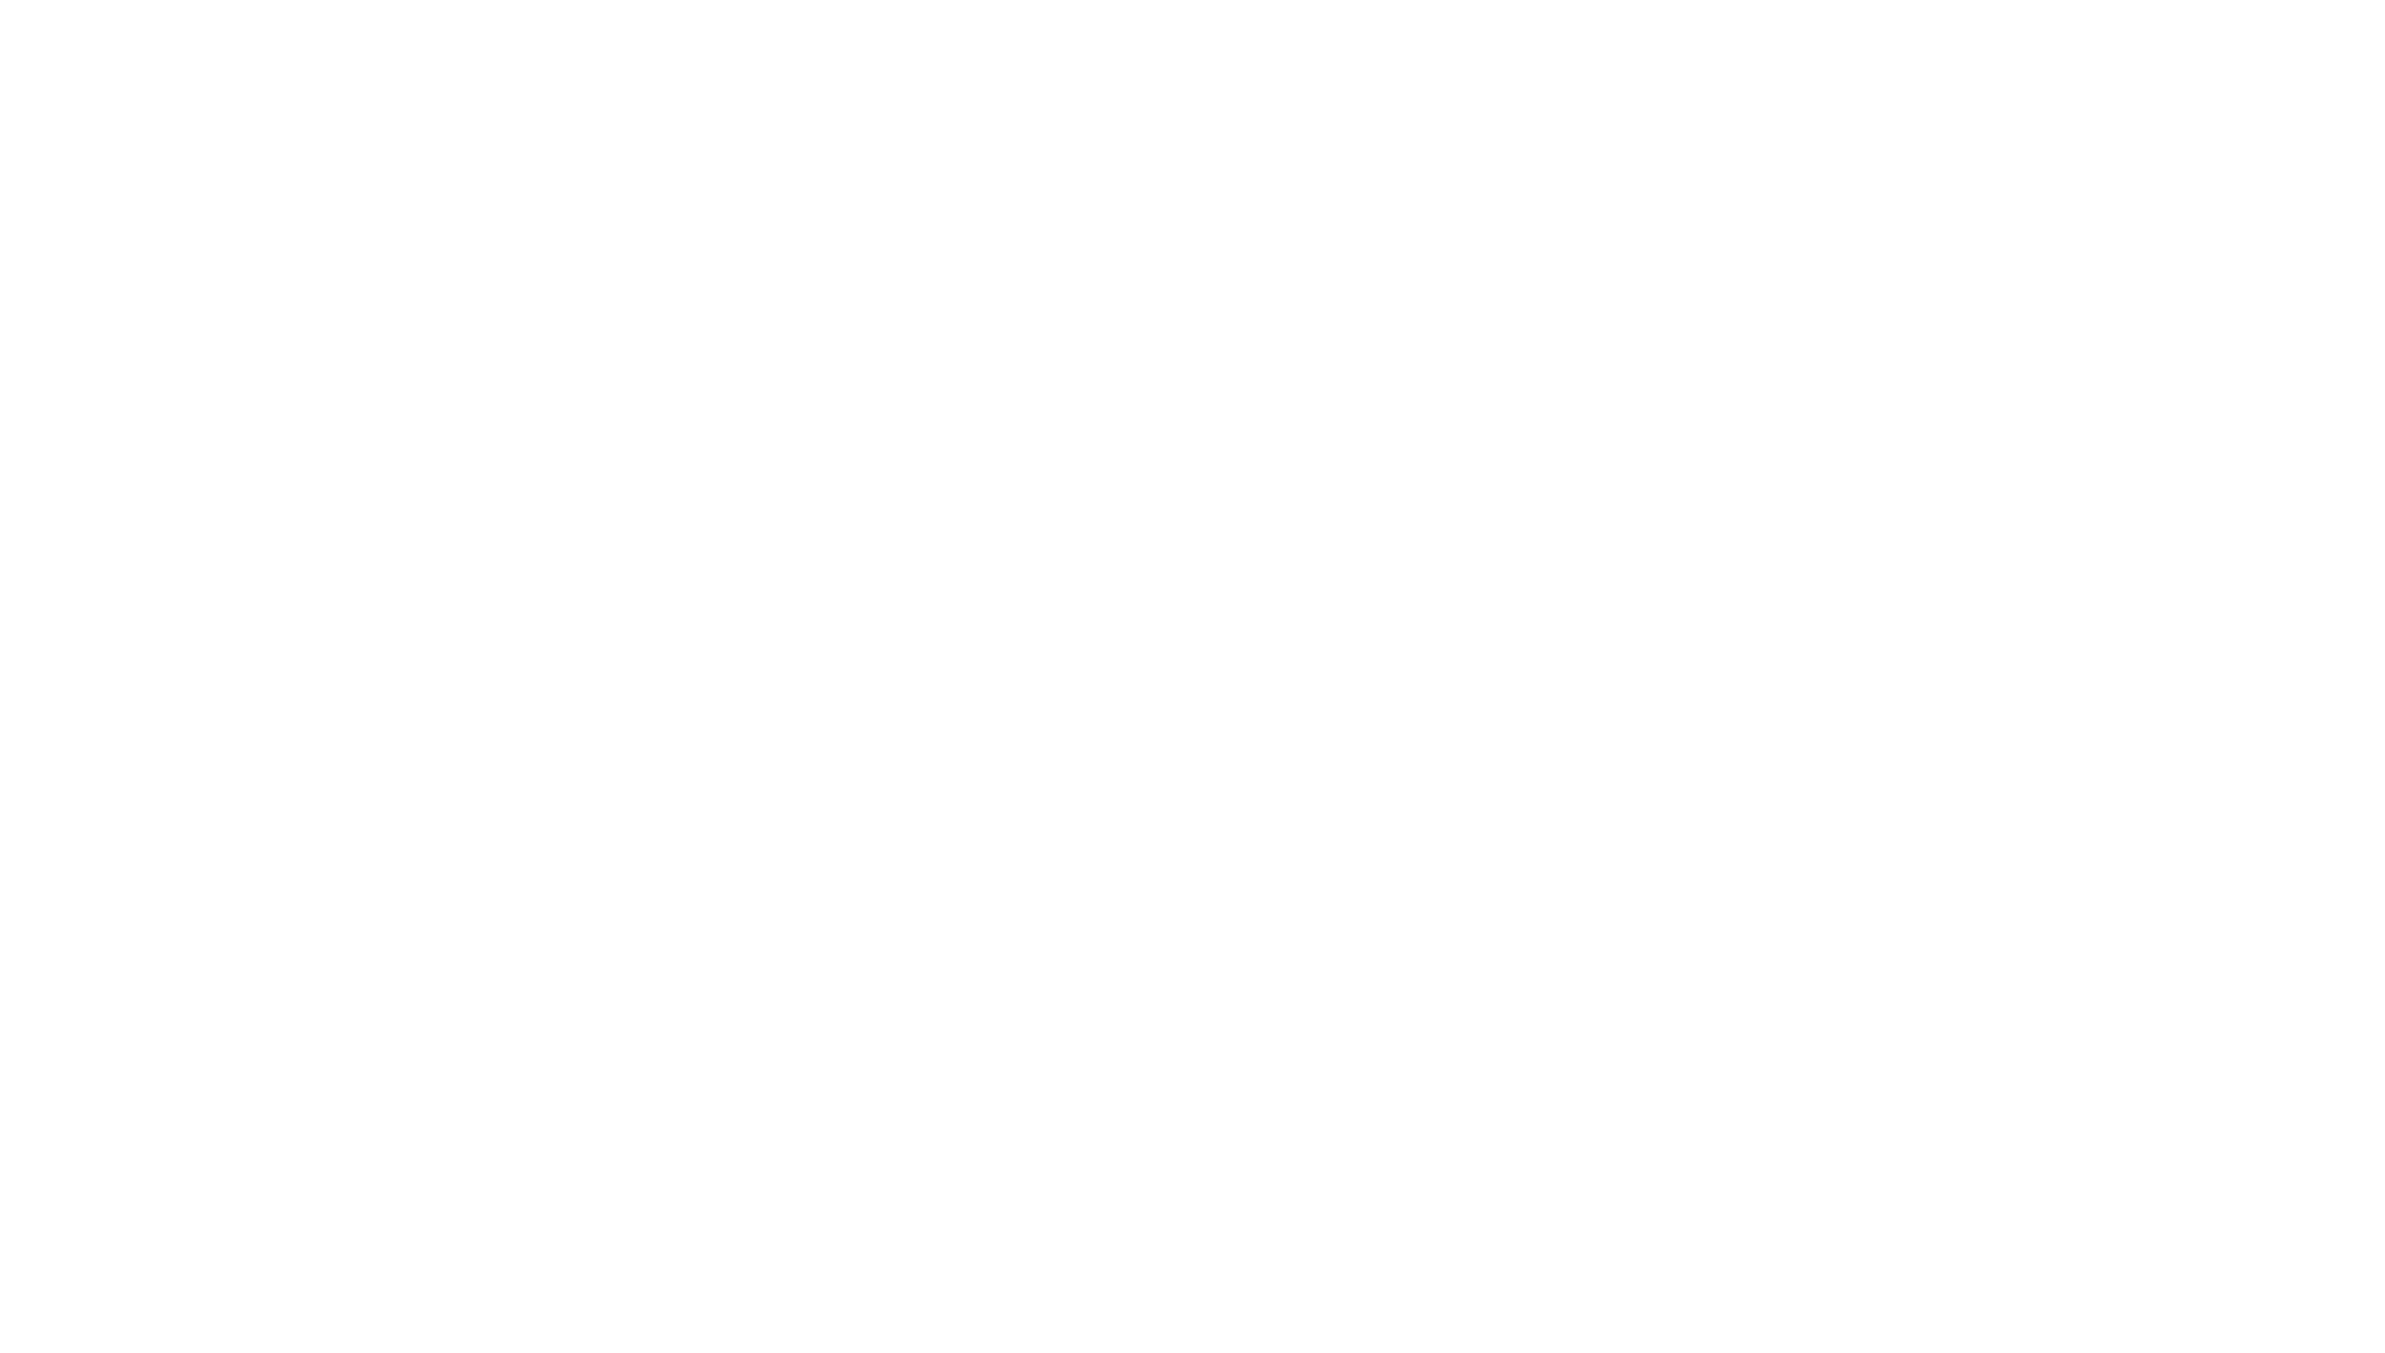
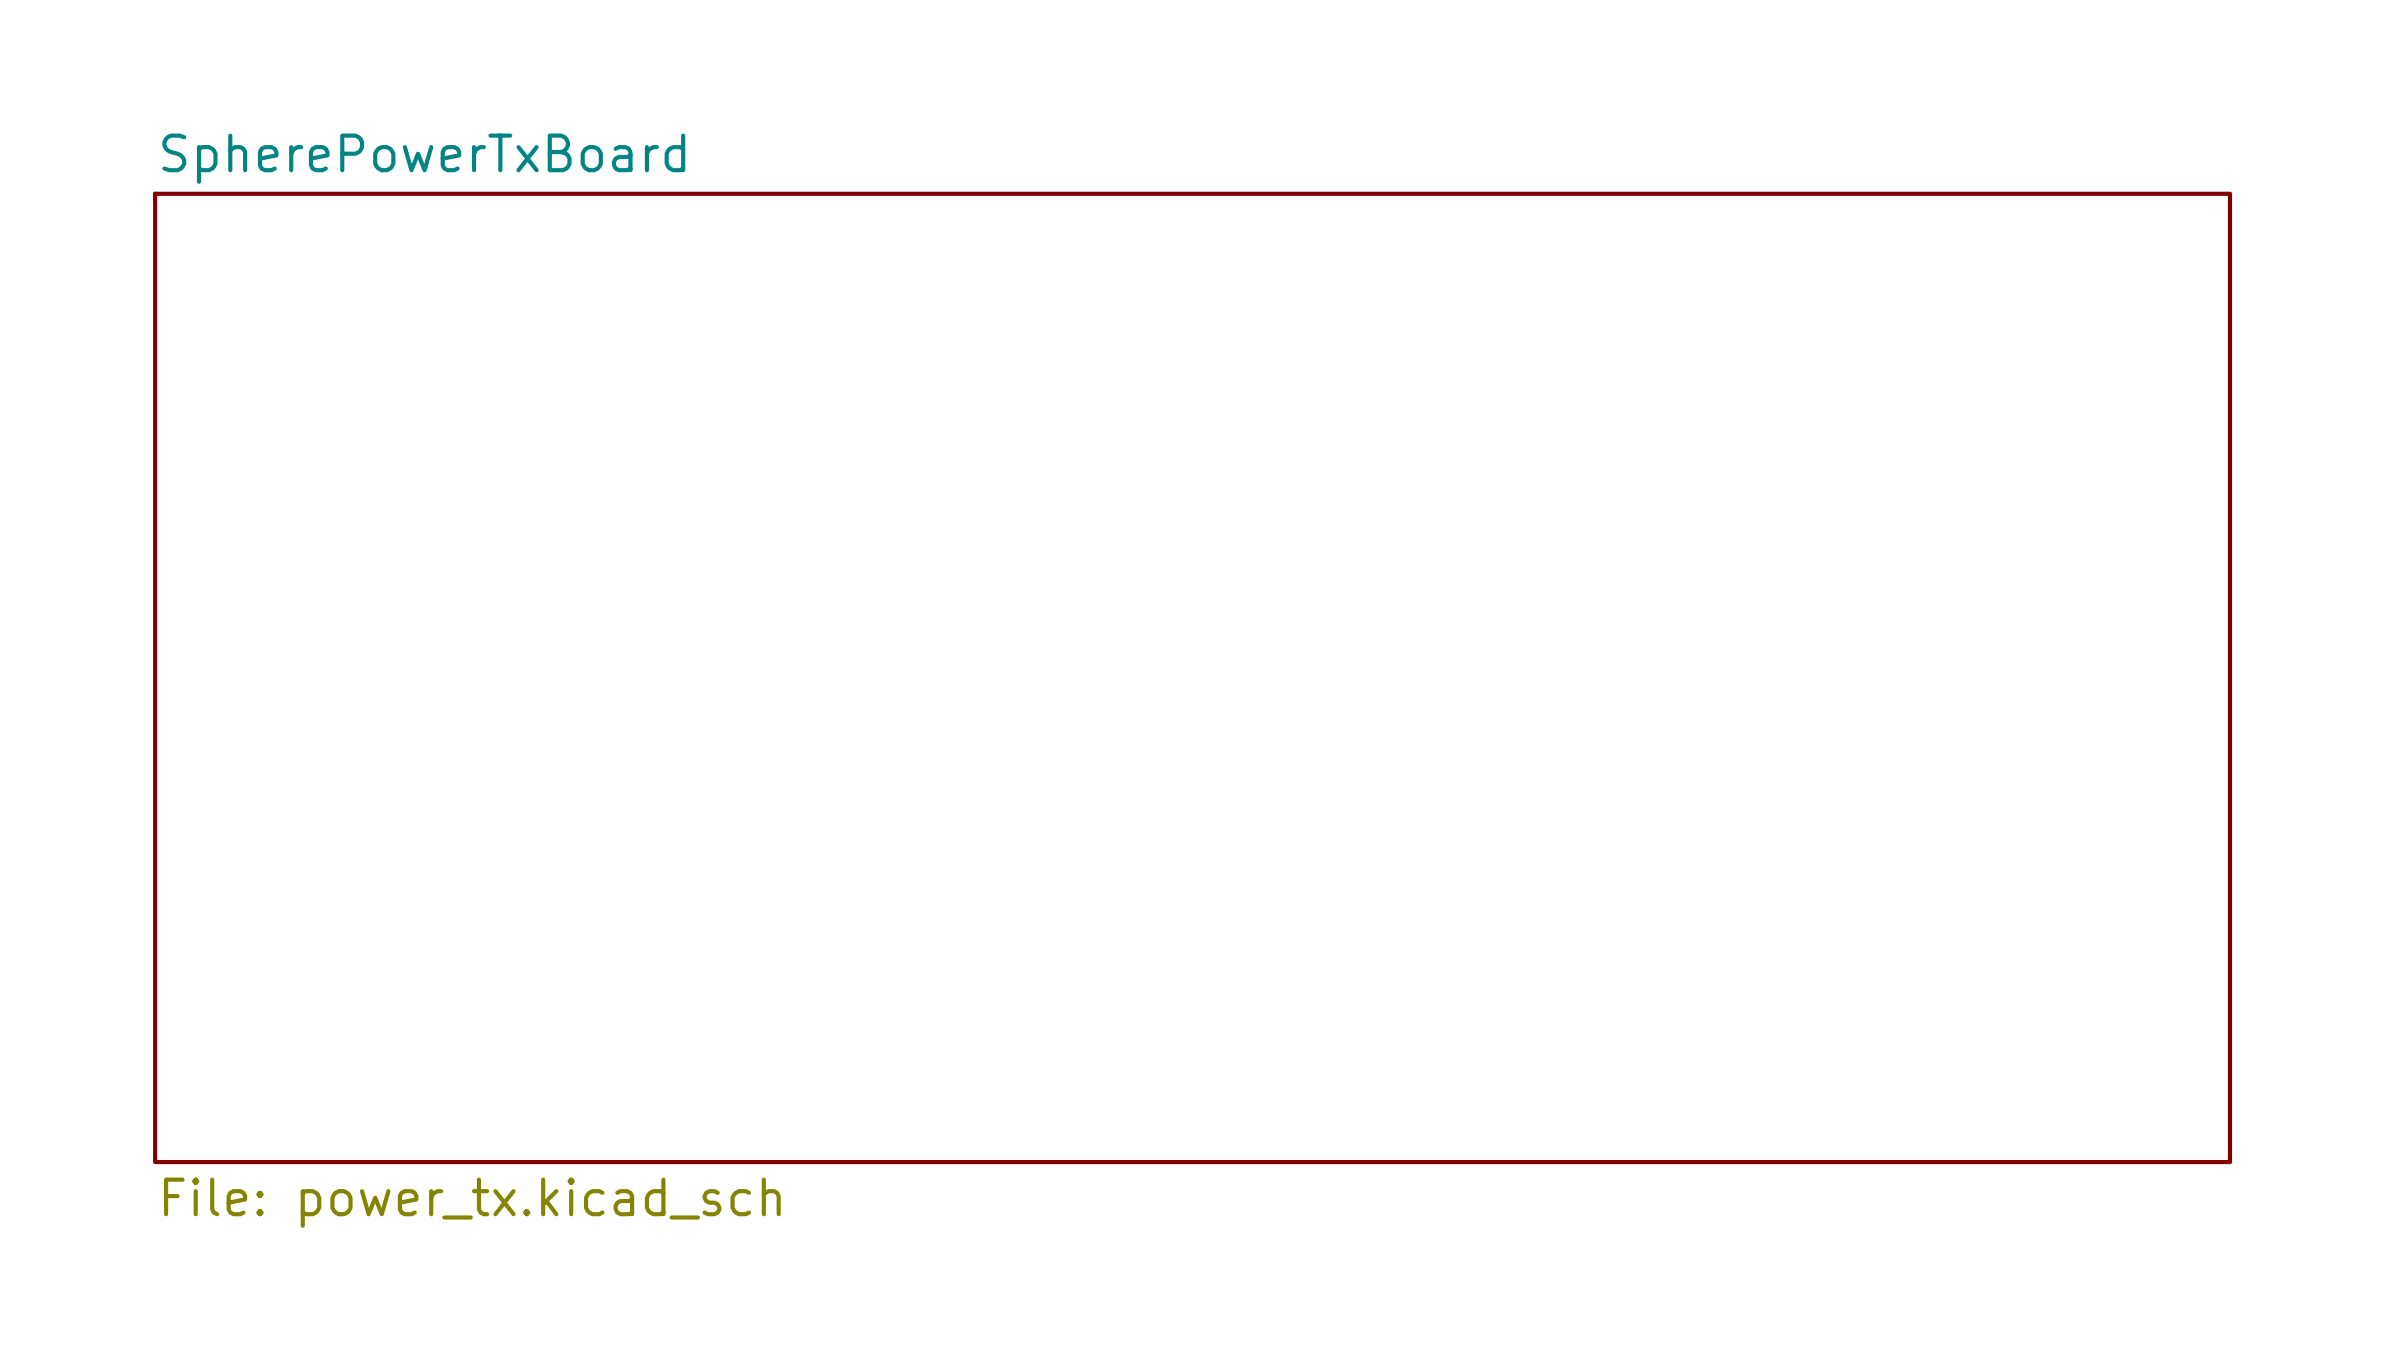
sheet SpherePowerTxBoard: none -> File: power_tx.kicad_sch (1192, 677)

